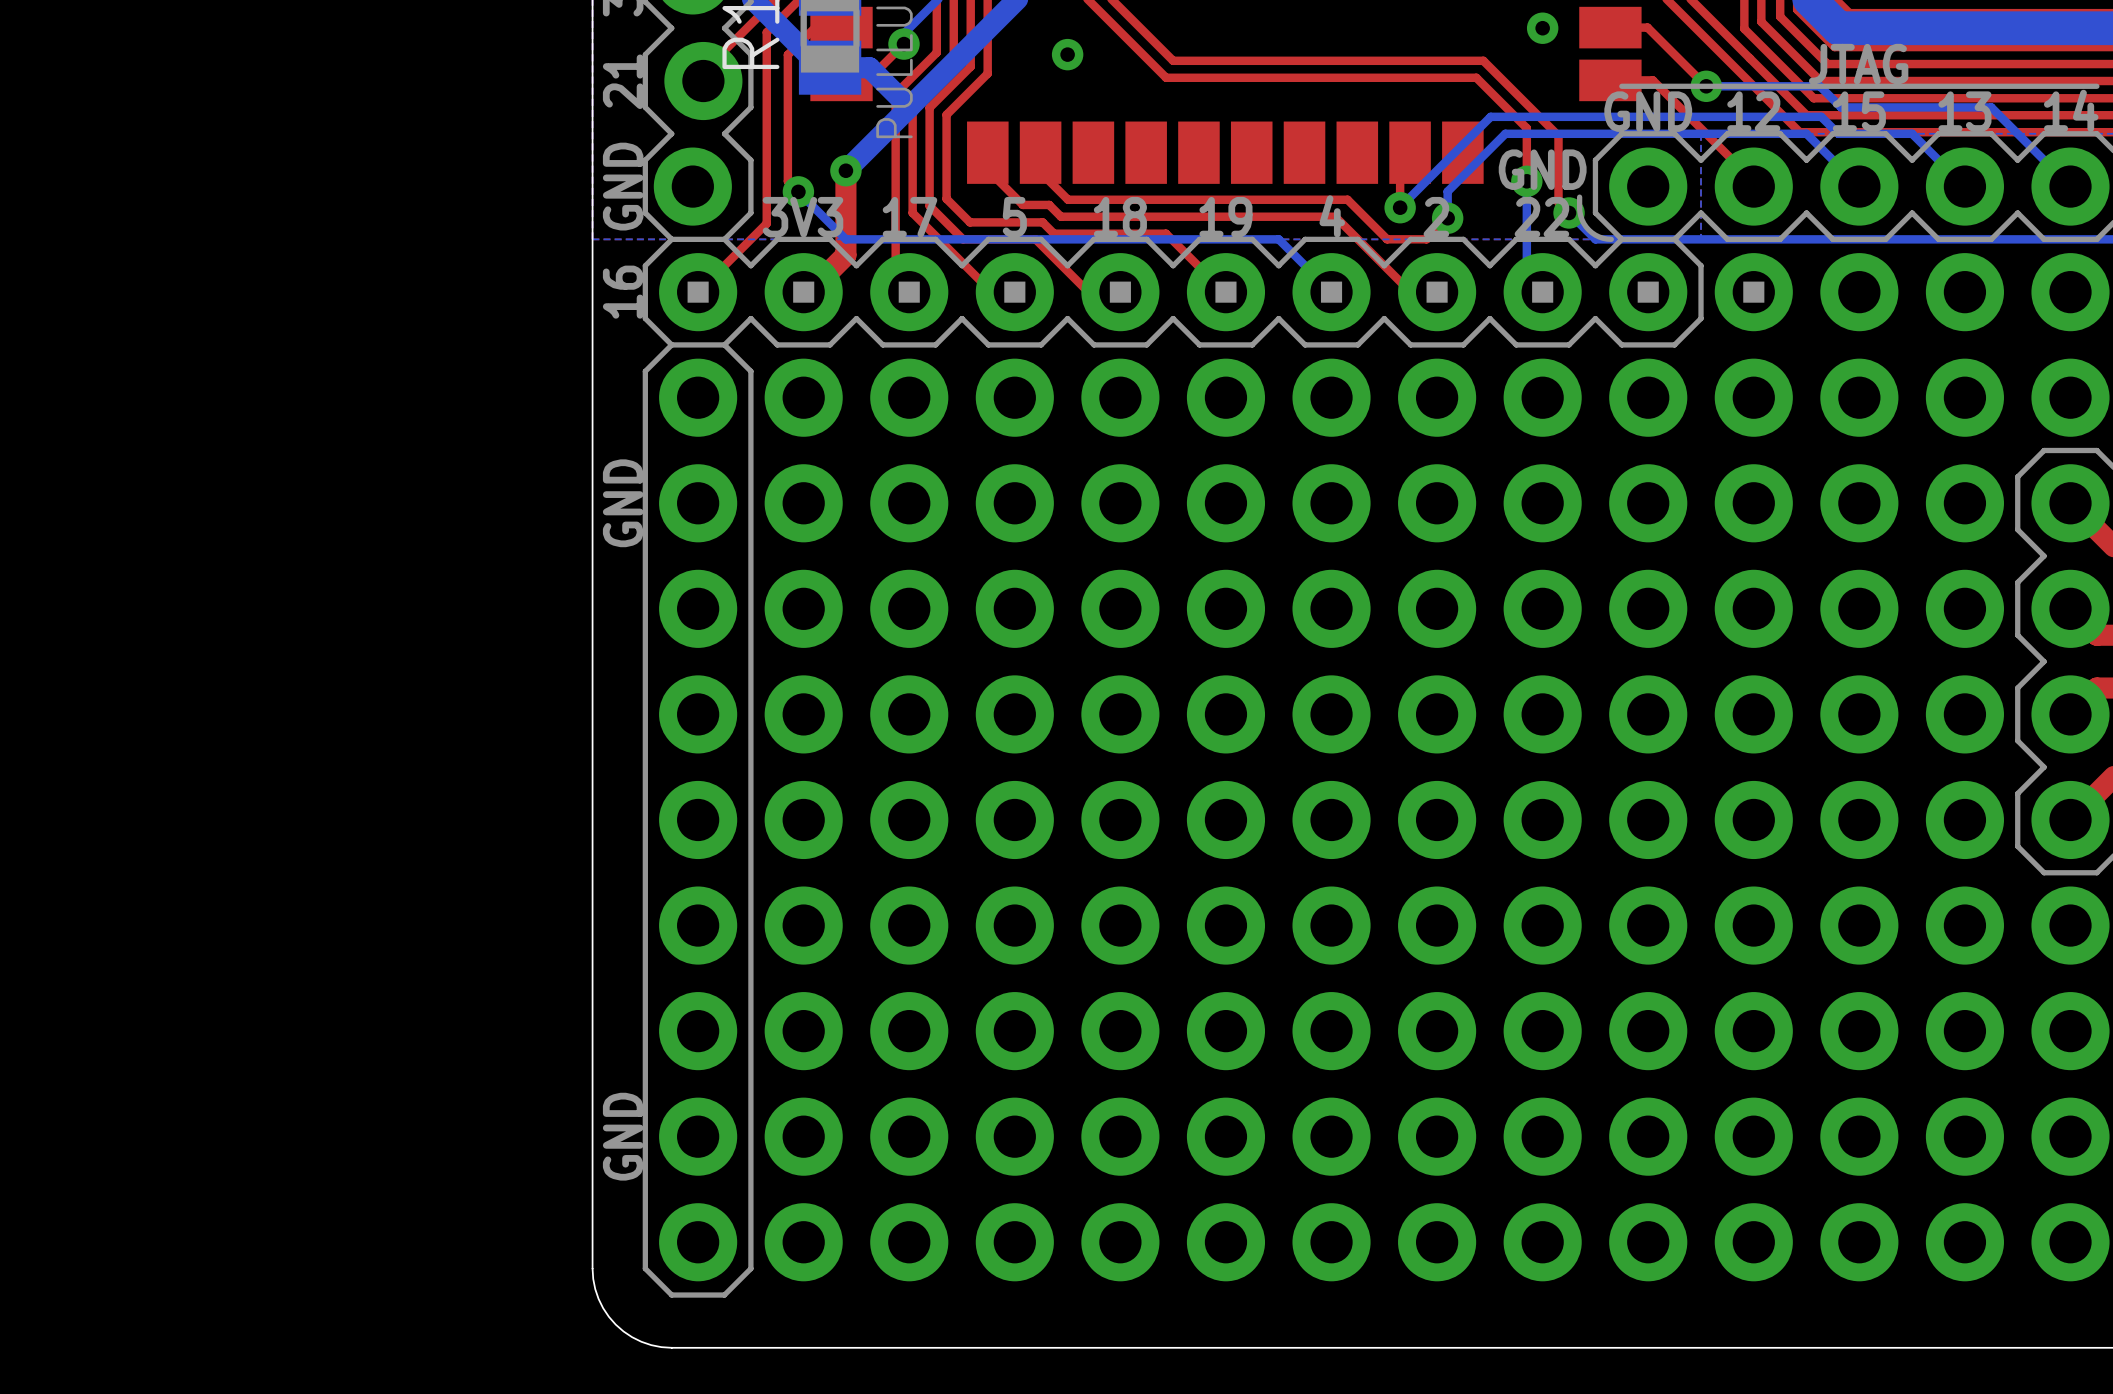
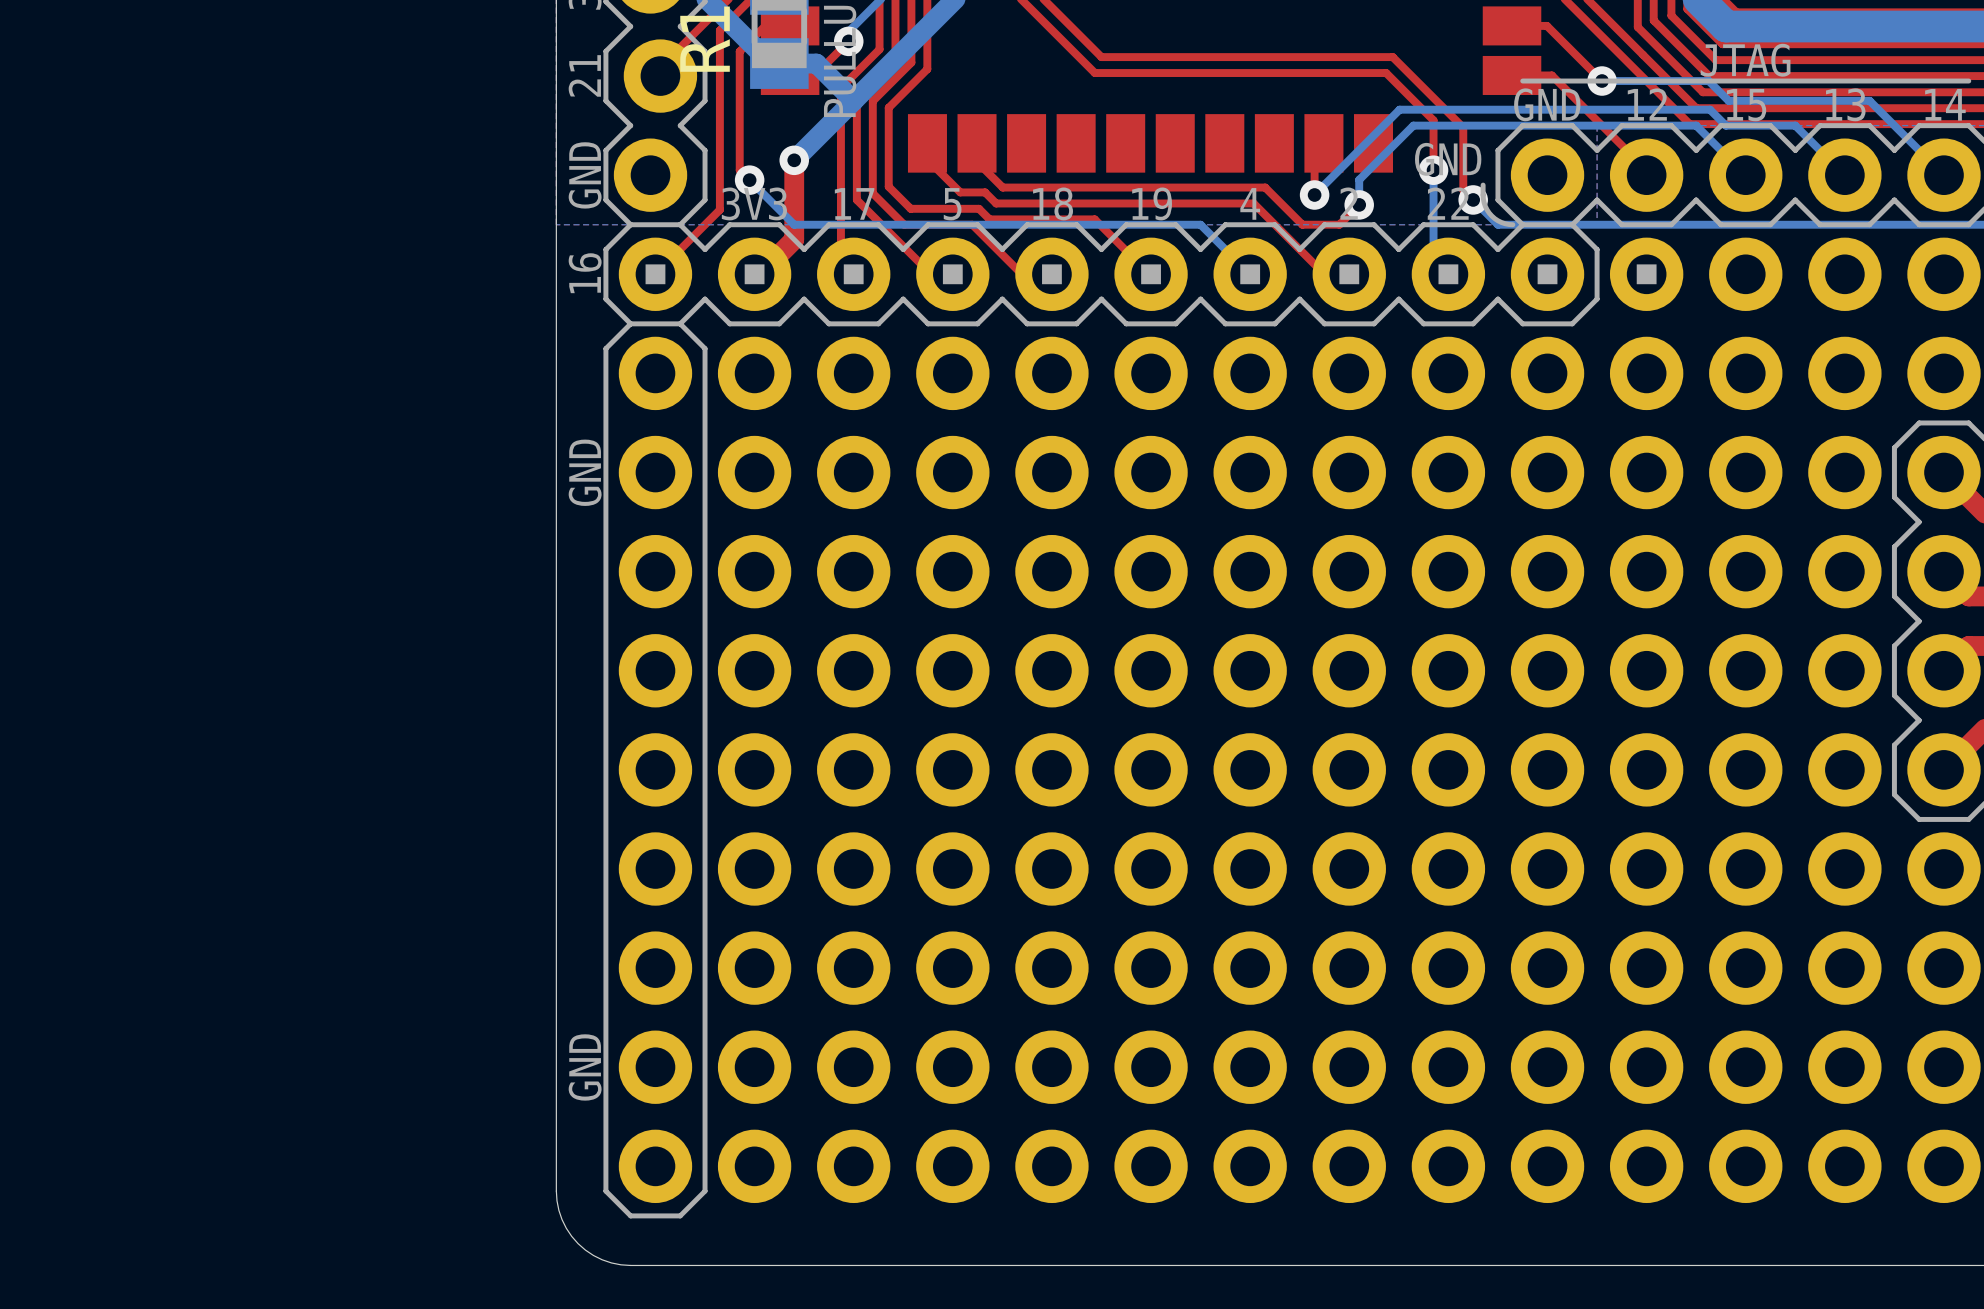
via: (1542, 28) -> none
via: (1067, 54) -> none

